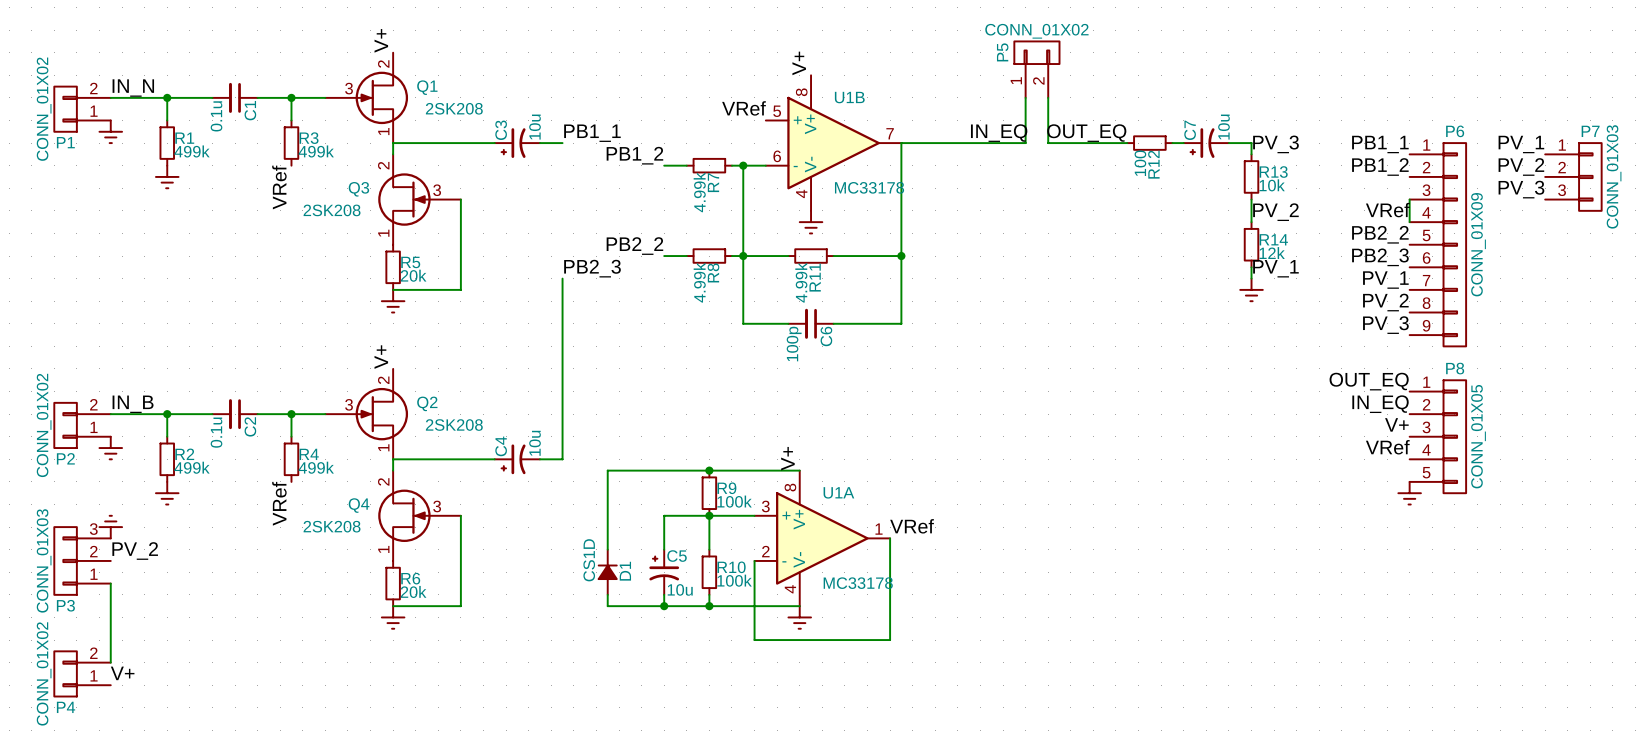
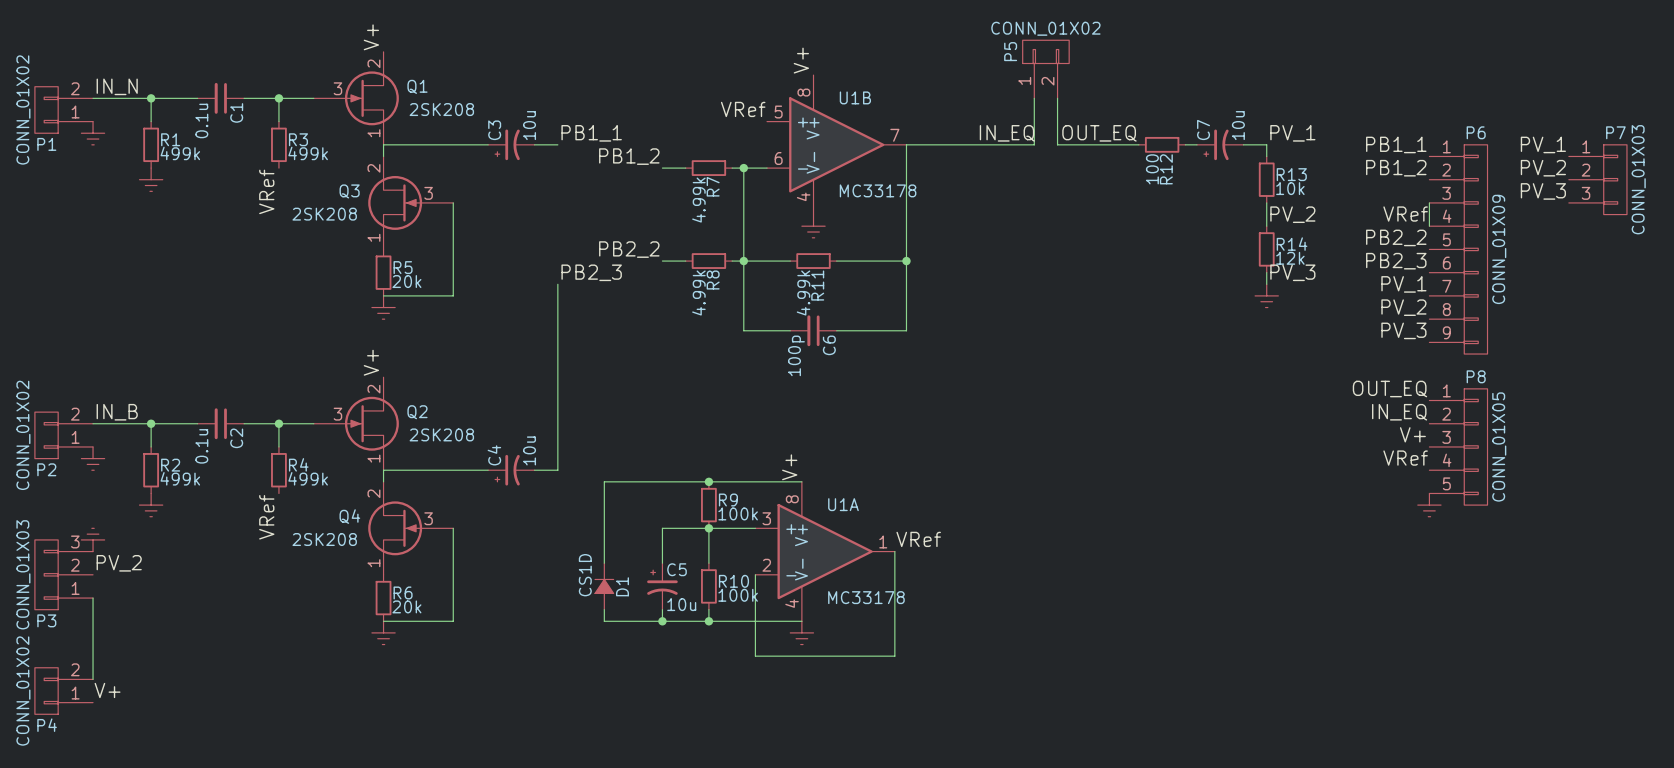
label: PV_3 (1275, 144) -> PV_1 (1292, 133)
label: PV_1 (1275, 268) -> PV_3 (1292, 272)

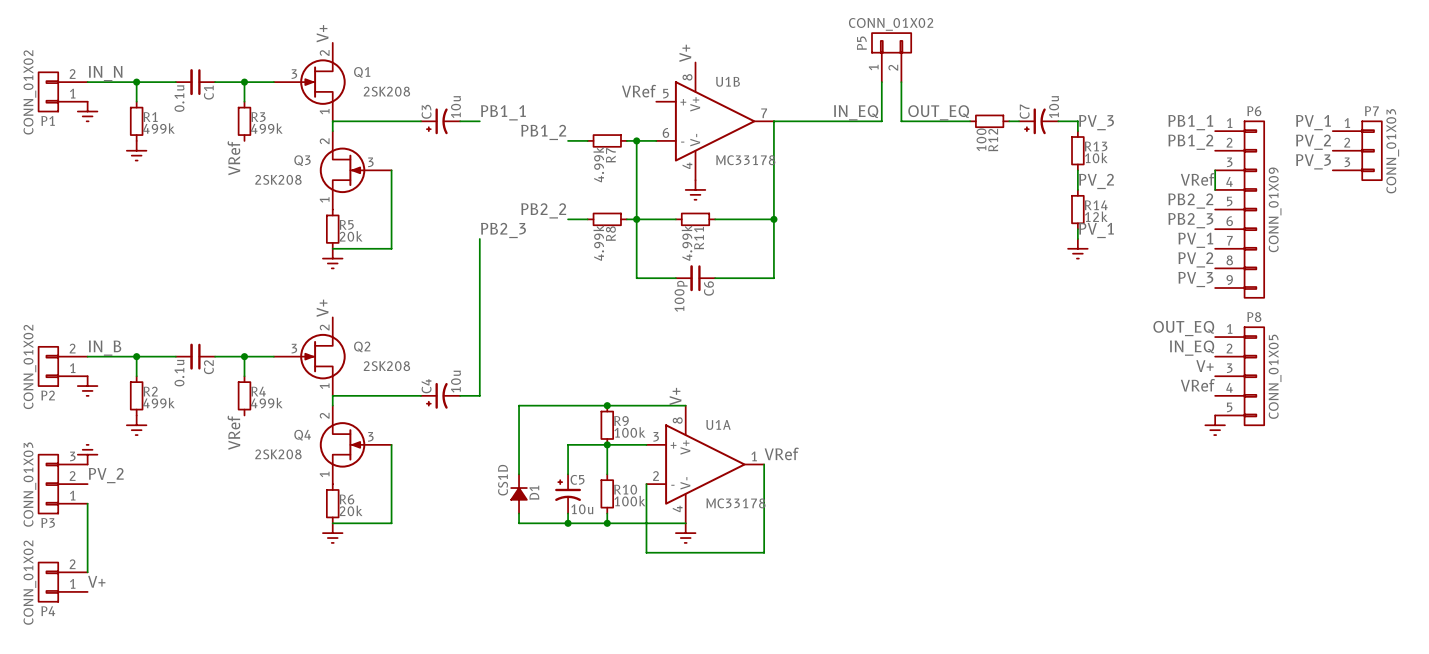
label: PV_1 (1292, 133) -> PV_3 (1096, 122)
label: PV_3 (1292, 272) -> PV_1 (1096, 230)

